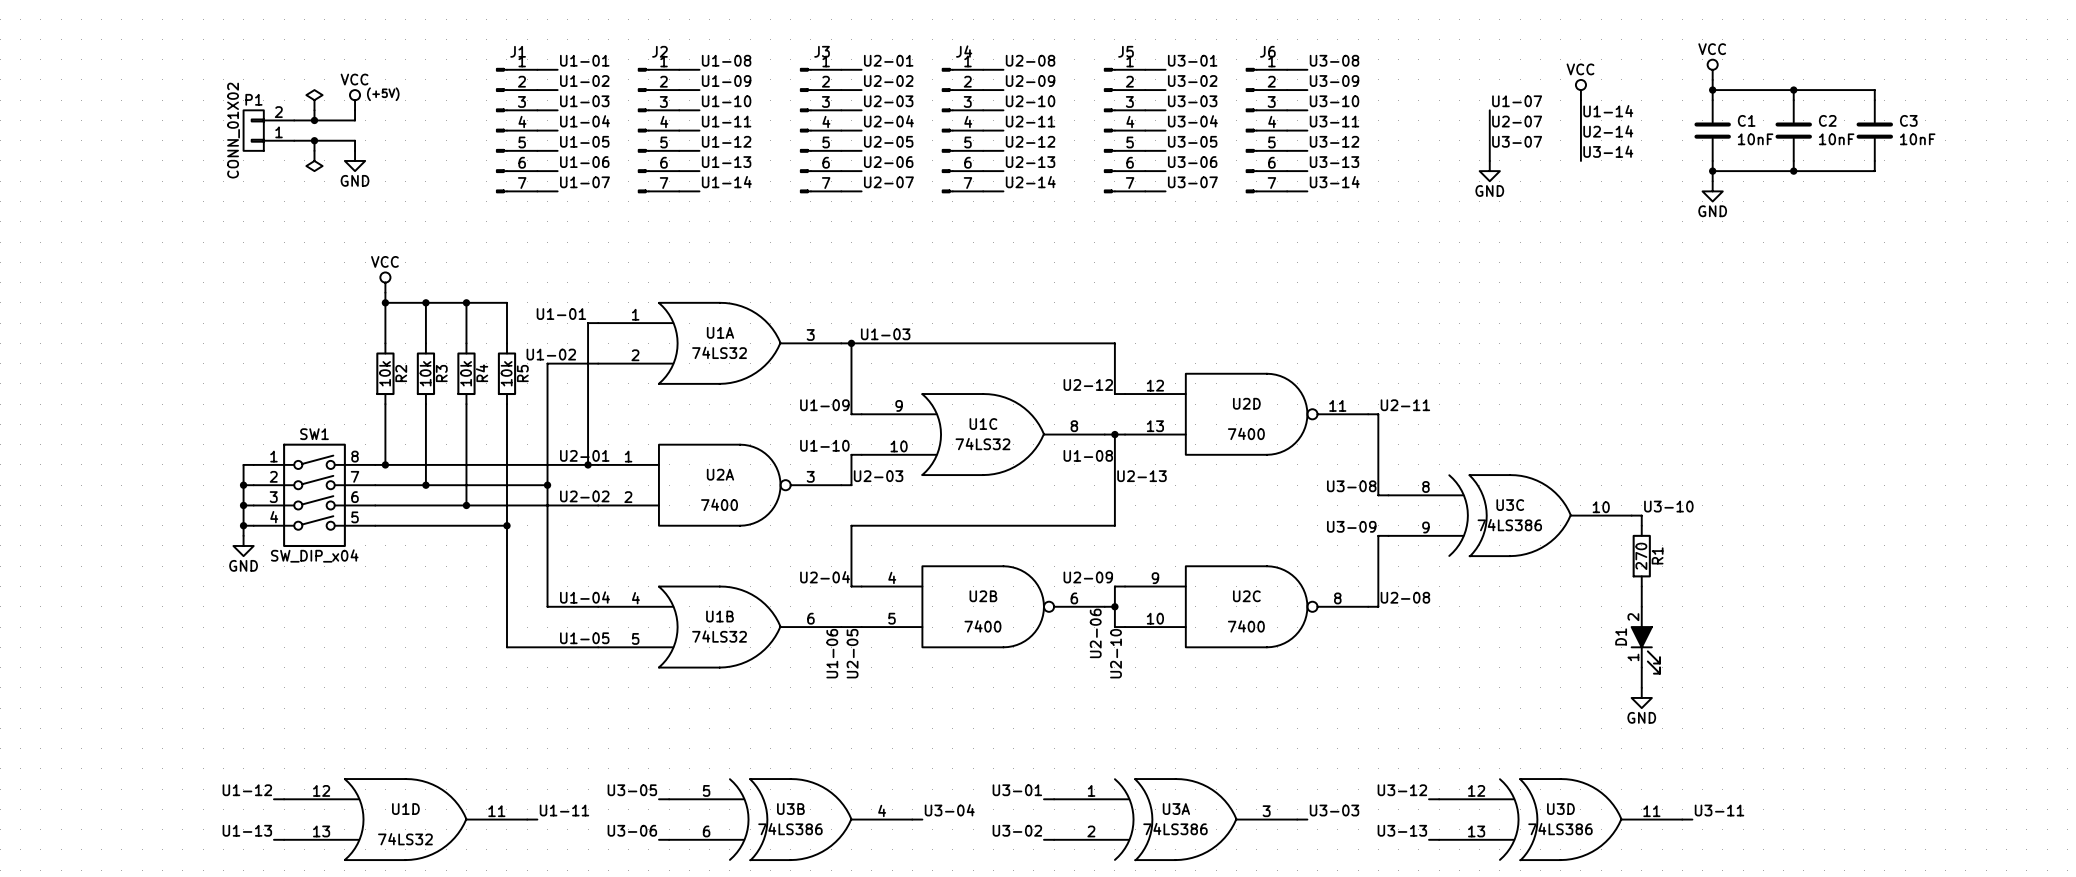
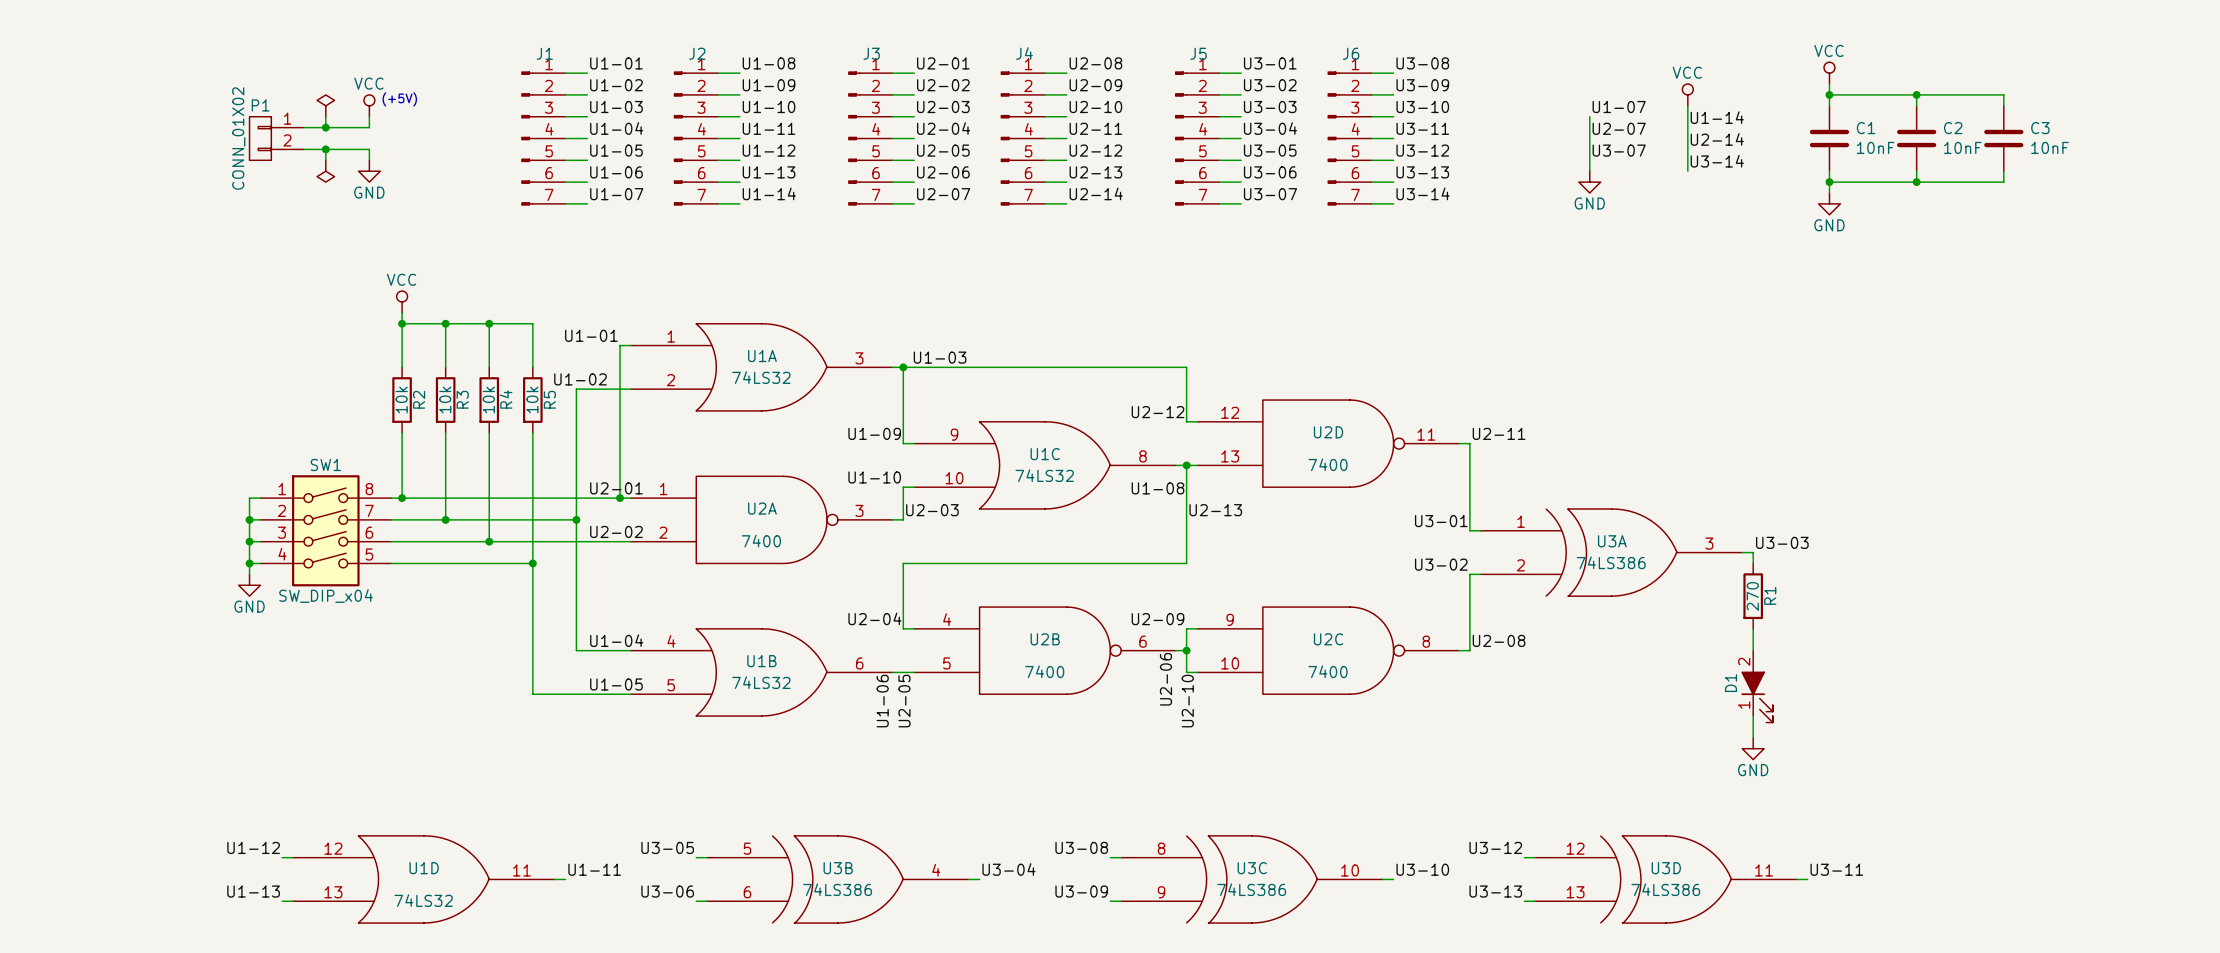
P1 flip: as is (253, 130) -> up-down (260, 138)
label: U3-08 (1351, 486) -> U3-01 (1441, 521)
label: U3-10 (1668, 506) -> U3-03 (1782, 542)
U3C position: (1510, 515) -> (1251, 879)
label: U3-09 (1351, 526) -> U3-02 (1441, 564)
label: U3-01 (1017, 790) -> U3-08 (1081, 847)
label: U3-03 (1334, 810) -> U3-10 (1422, 869)
U3A position: (1175, 819) -> (1611, 552)
label: U3-02 (1017, 830) -> U3-09 (1081, 891)

